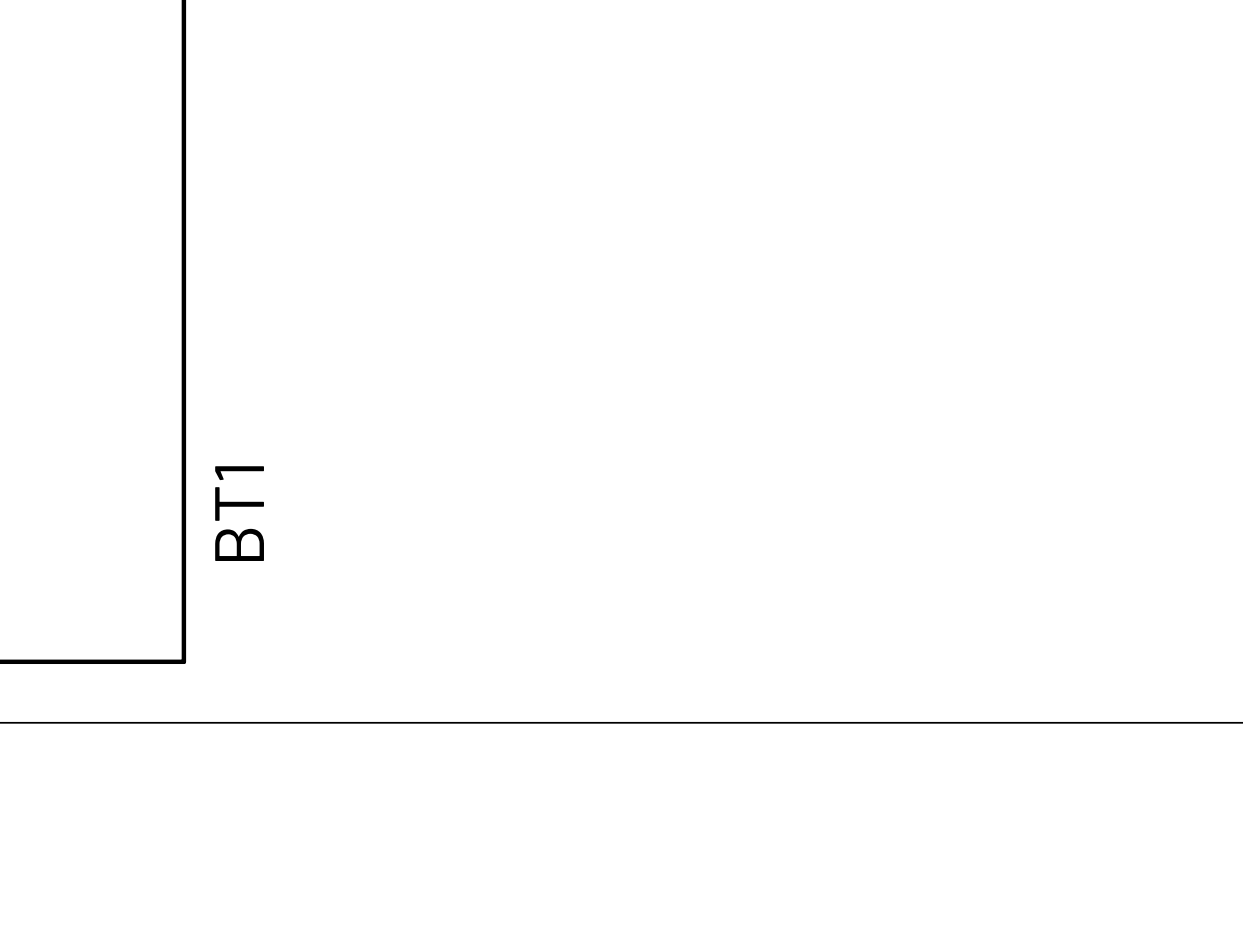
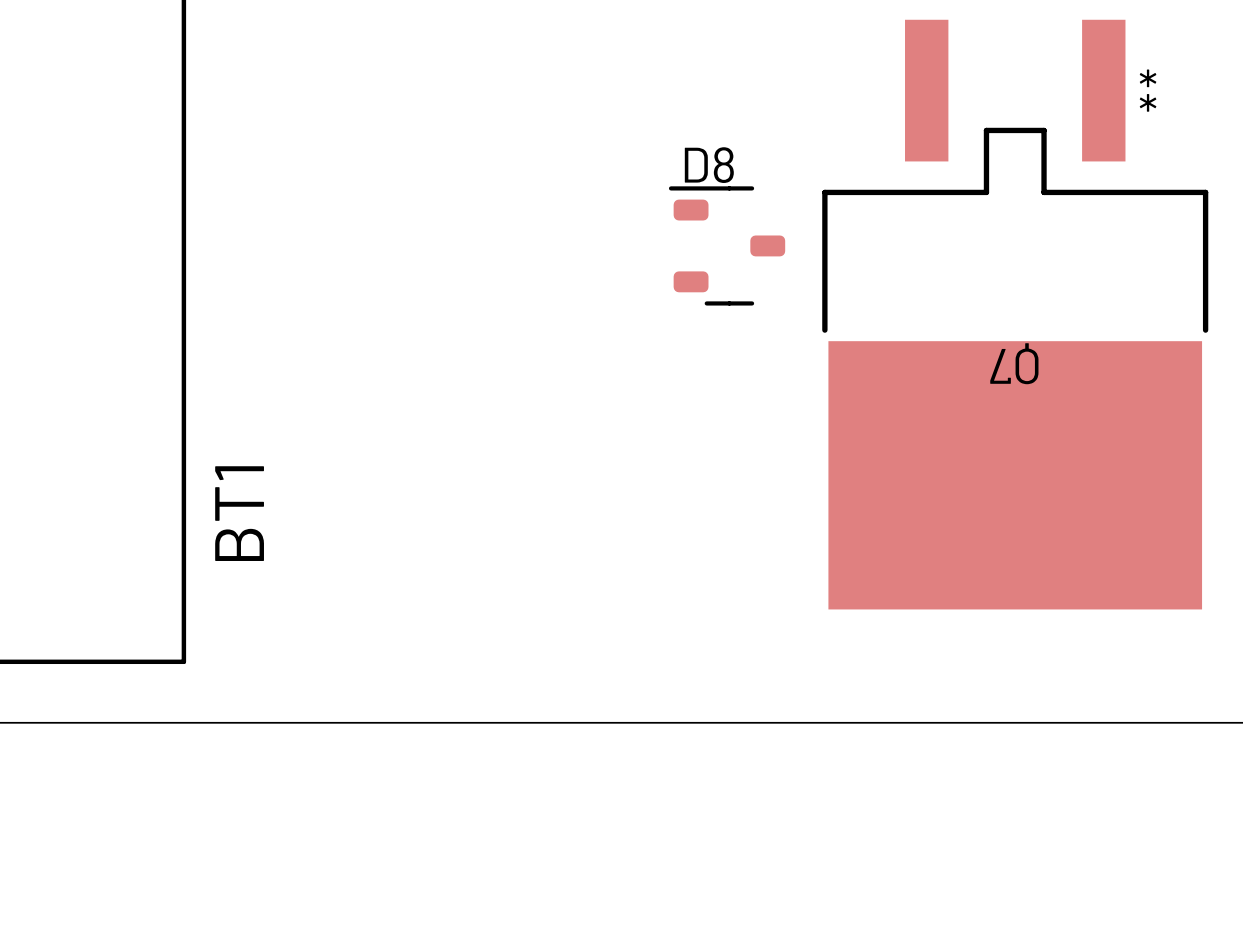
D8: none -> (727, 245)
Q7: none -> (1015, 314)

